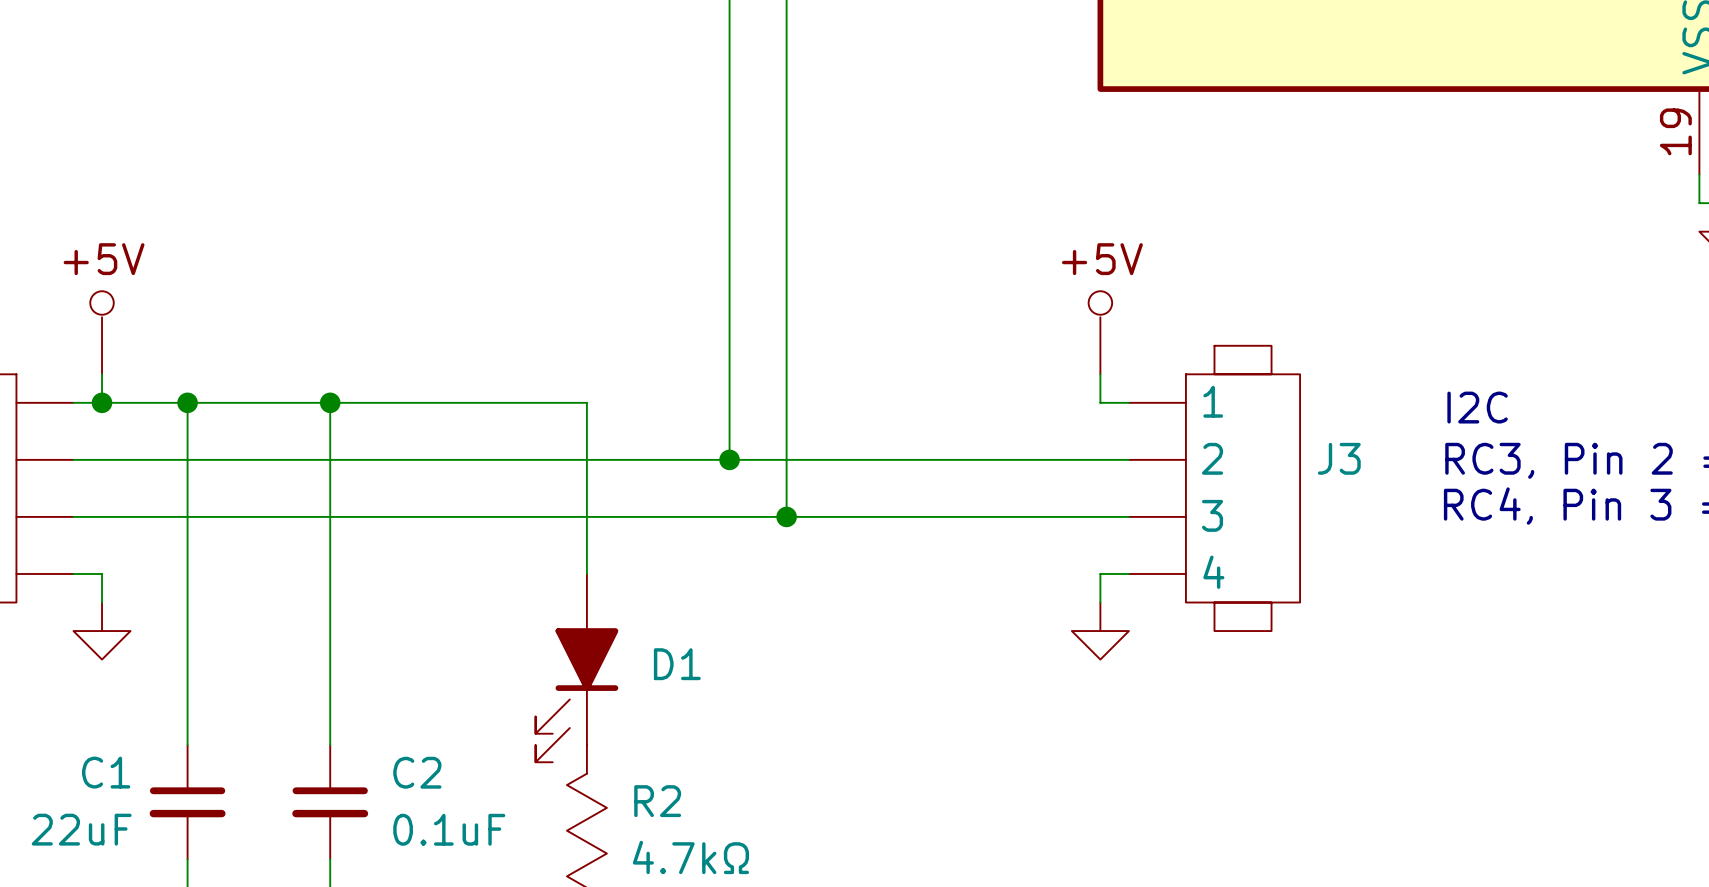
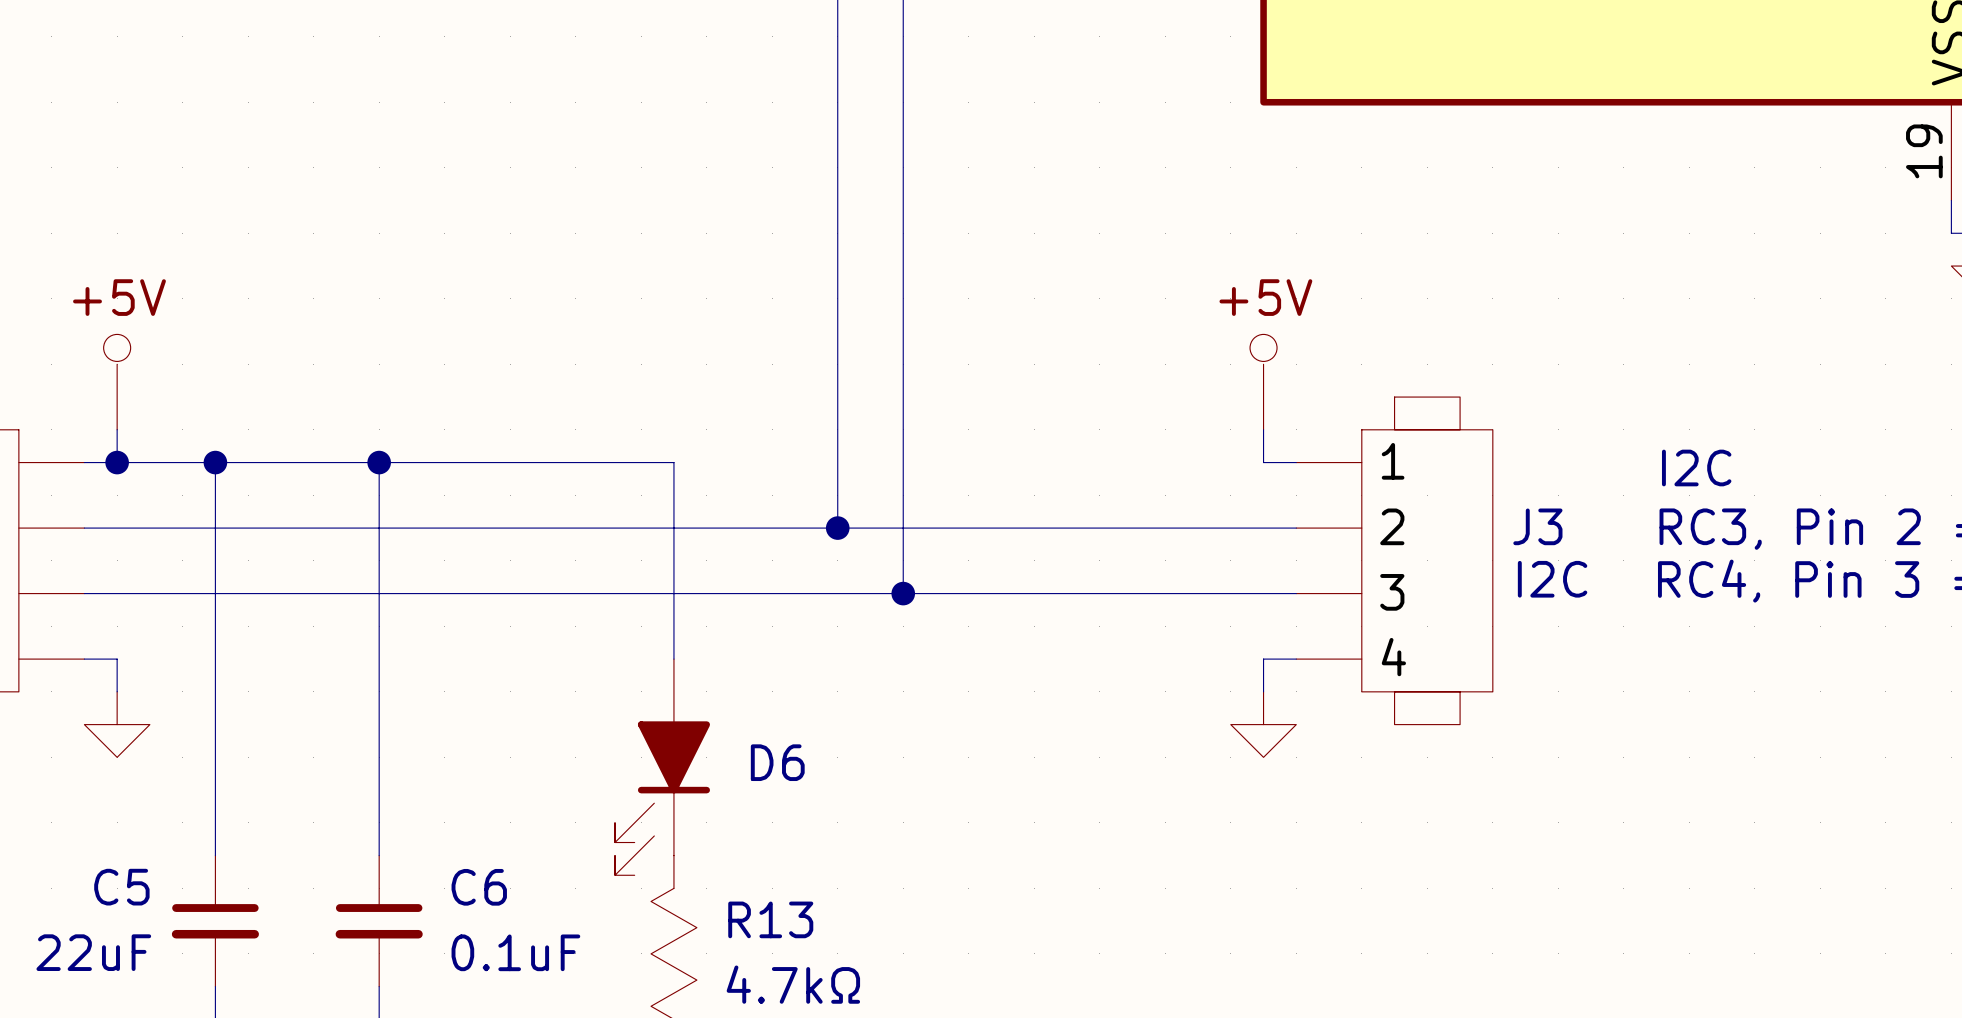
J3 value: none -> I2C (1552, 579)
D1 name: D1 (677, 664) -> D6 (777, 762)
C1 name: C1 (106, 772) -> C5 (121, 887)
C2 name: C2 (417, 772) -> C6 (479, 887)
R2 name: R2 (657, 801) -> R13 (770, 919)

